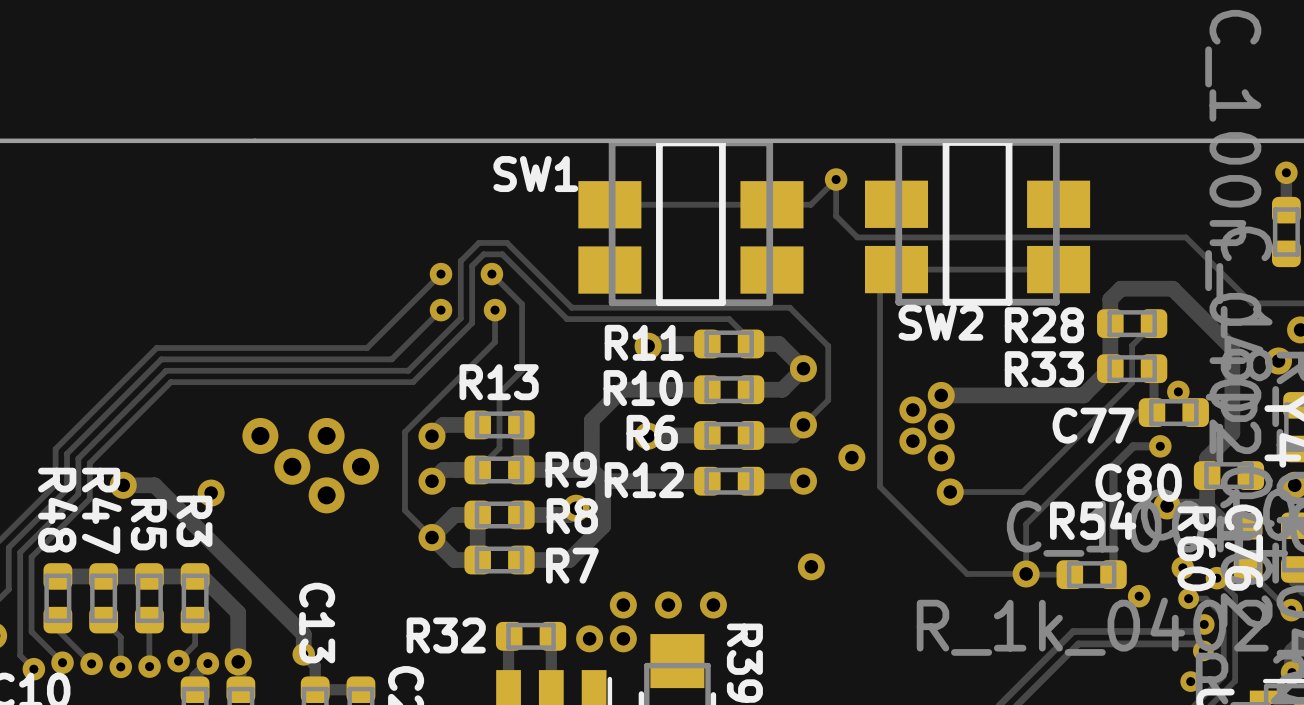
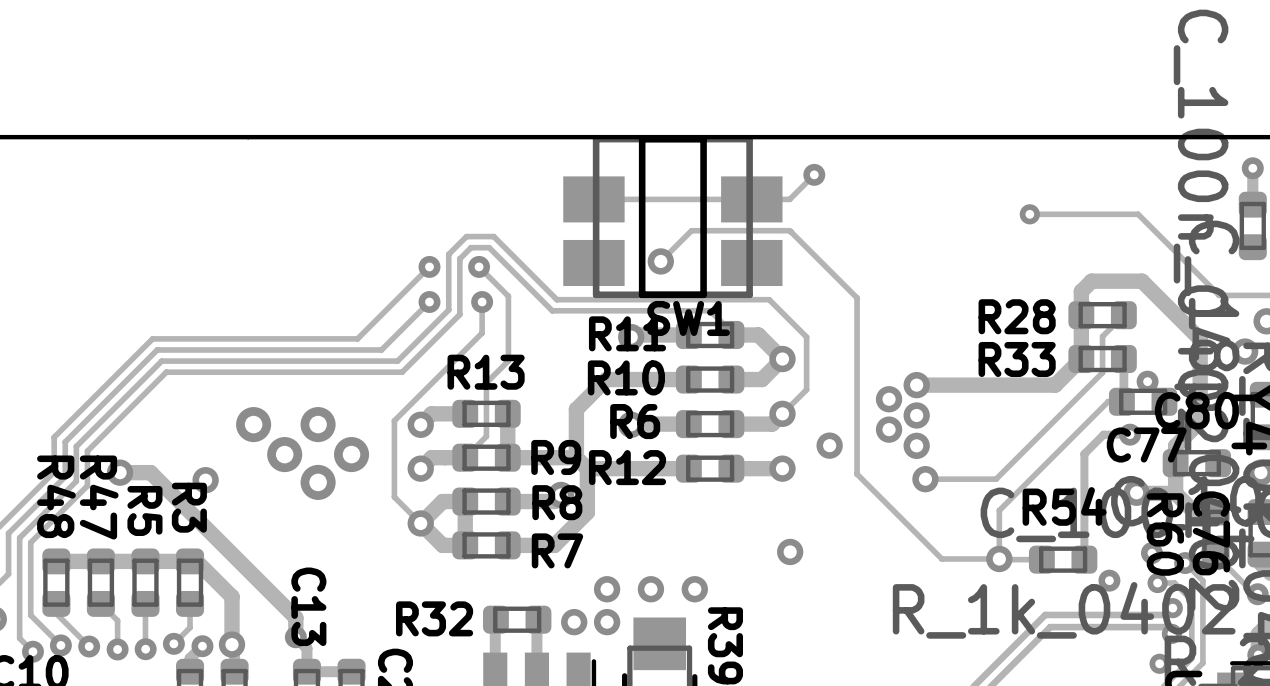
SW1 name position: SW1 (535, 174) -> SW1 (688, 318)
track: (836, 179) (836, 216) (857, 237) (1186, 237) -> (1029, 214) (1138, 214) (1155, 231)
via: none -> (1029, 214)
SW2: (977, 222) -> none
via: none -> (660, 261)
track: (1058, 269) (896, 269) (880, 286) (880, 305) -> (660, 261) (691, 230) (789, 230) (857, 297)
C77 name position: C77 (1093, 425) -> C77 (1146, 445)
C80 name position: C80 (1138, 482) -> C80 (1196, 410)

